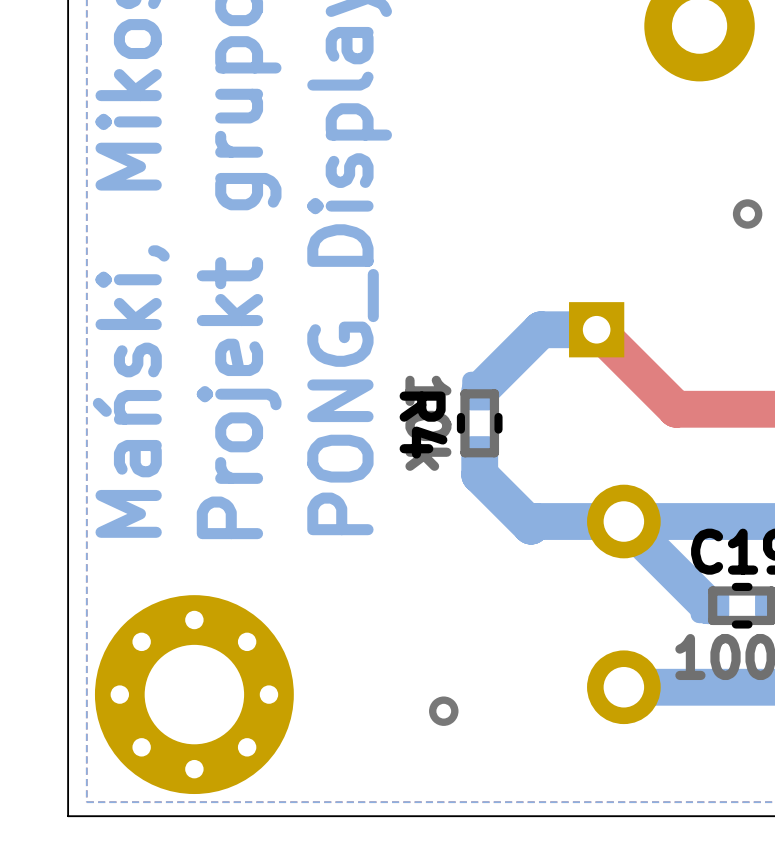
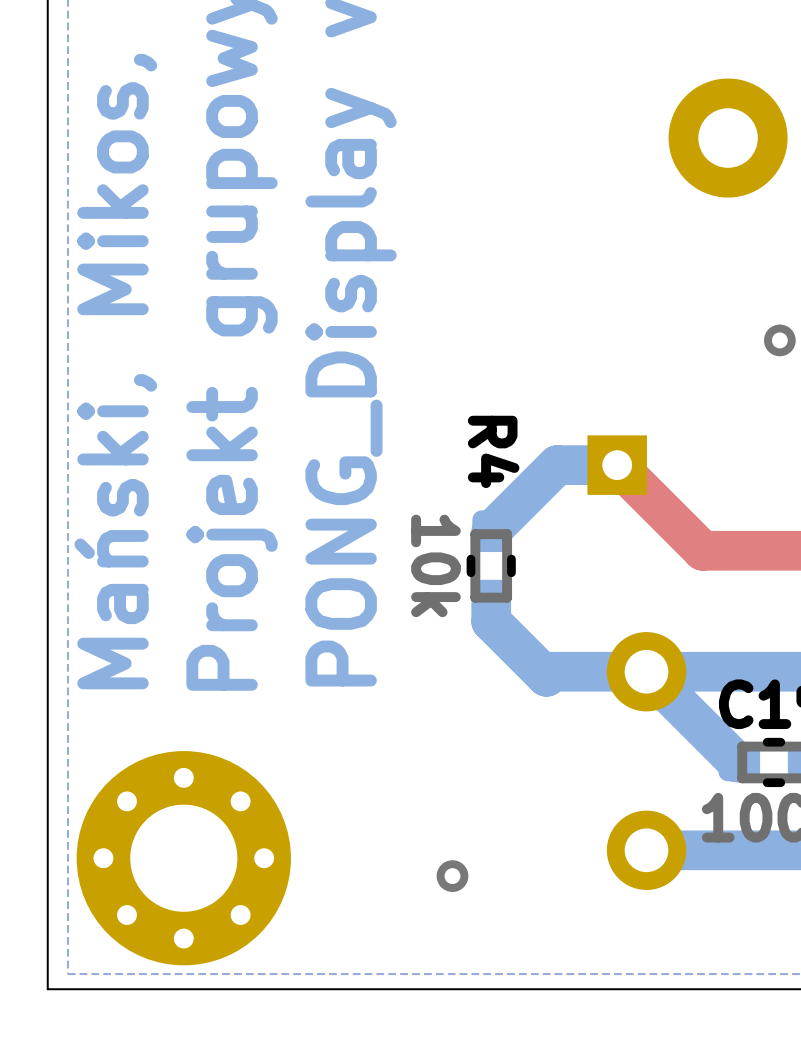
R4 name position: R4 (423, 425) -> R4 (493, 451)

